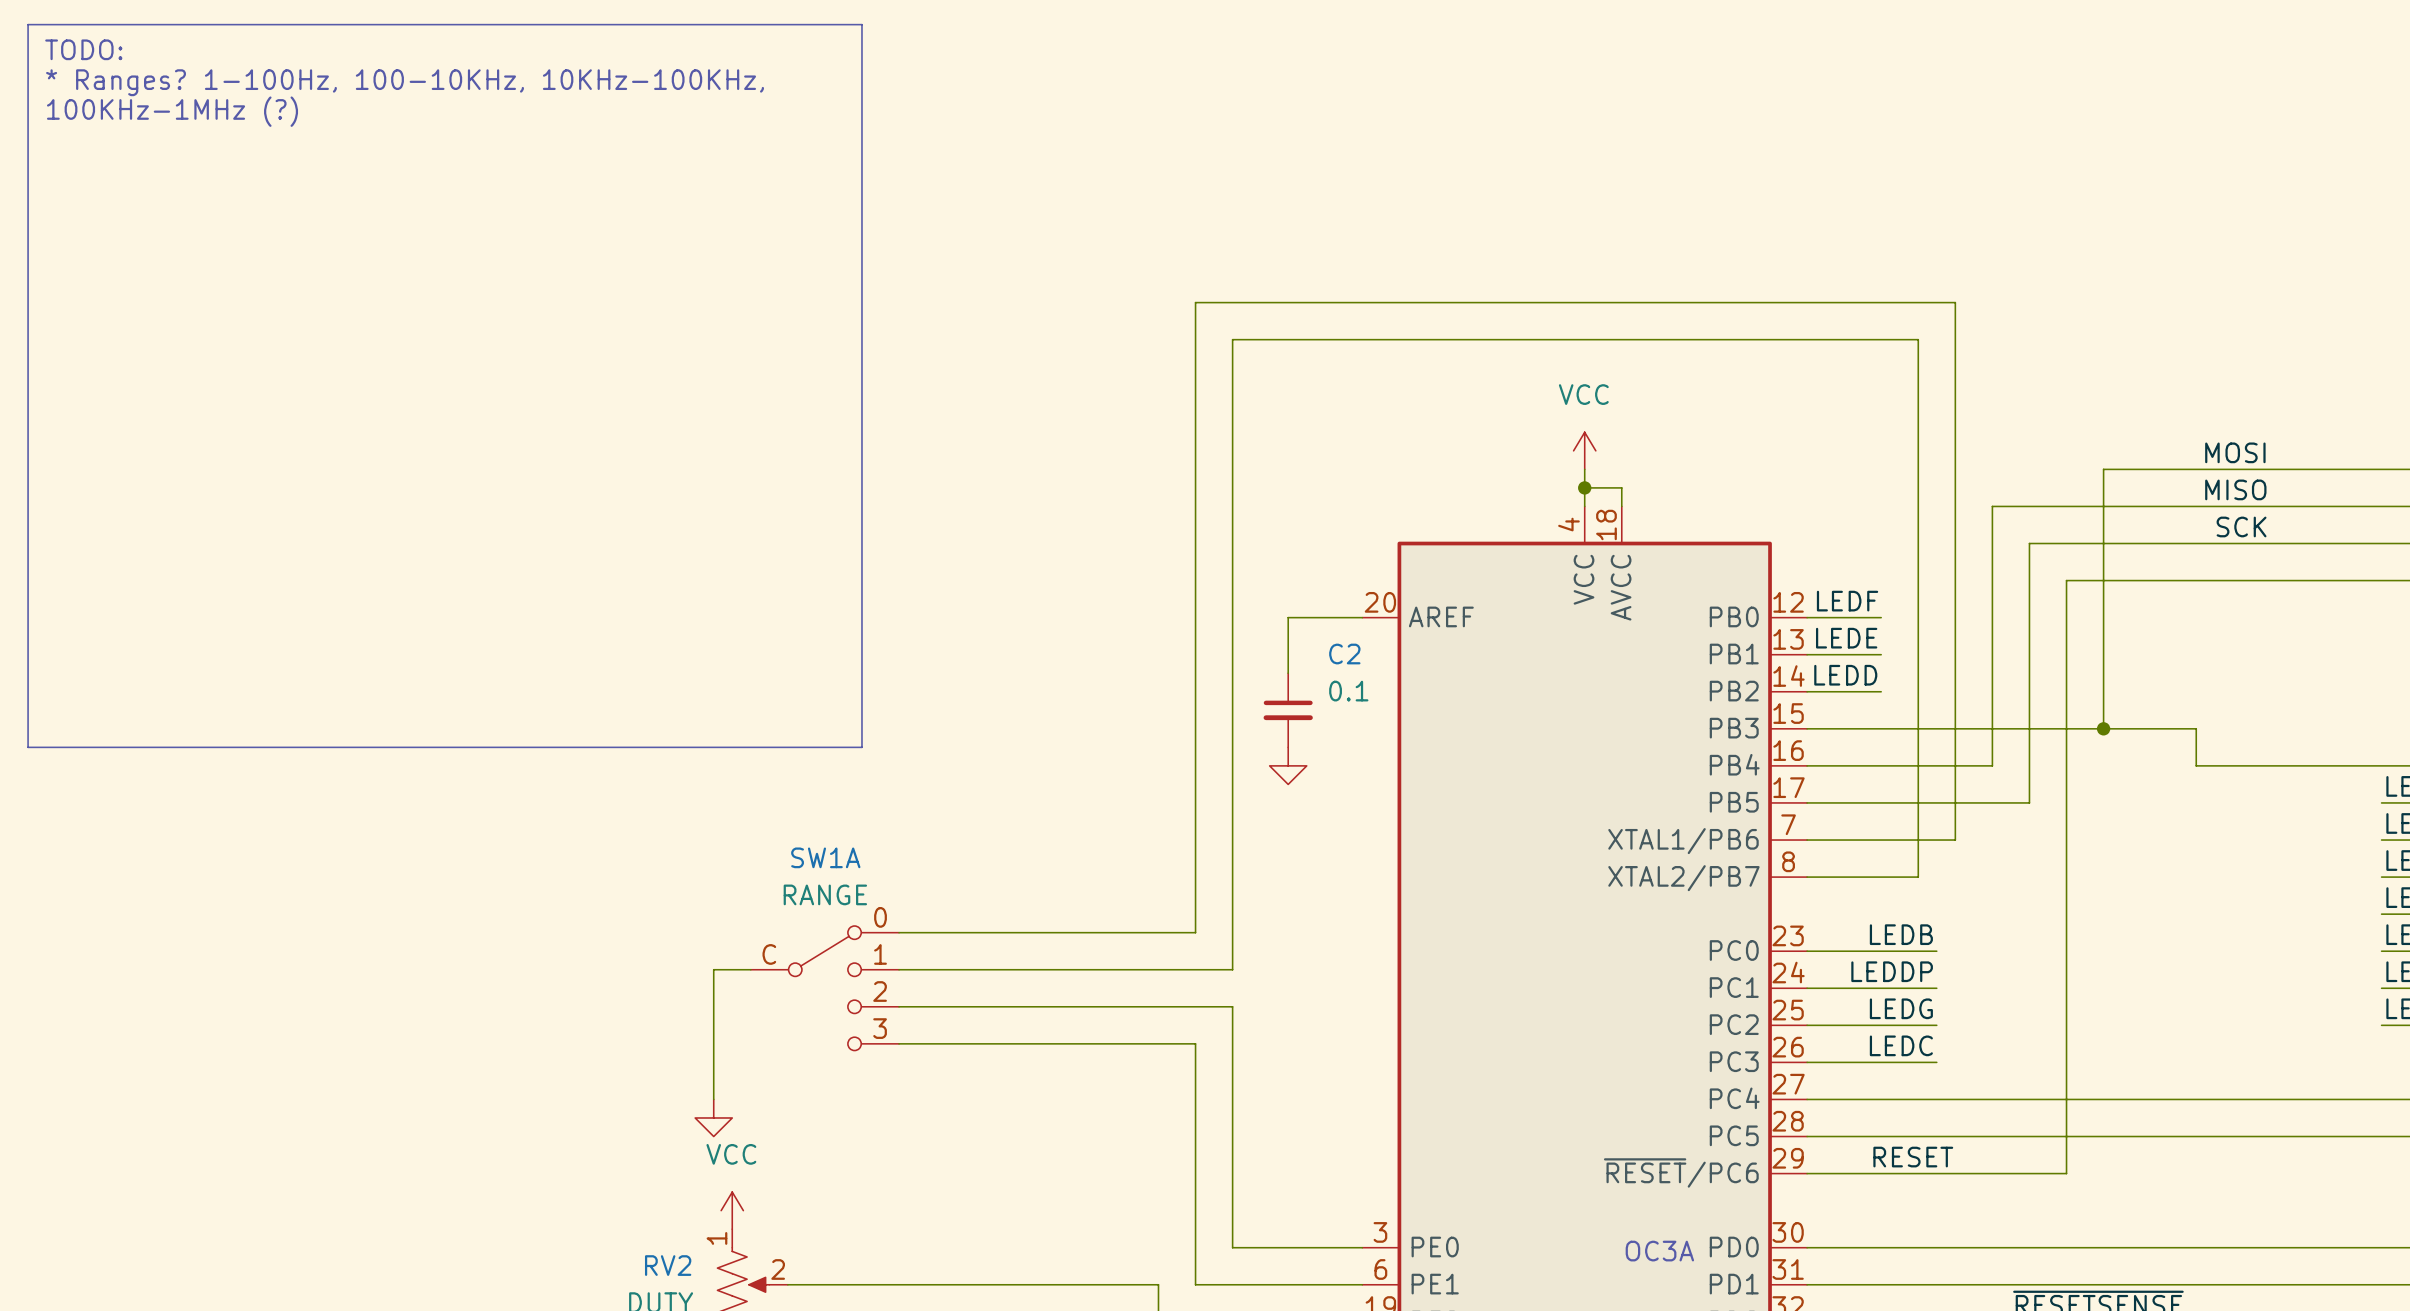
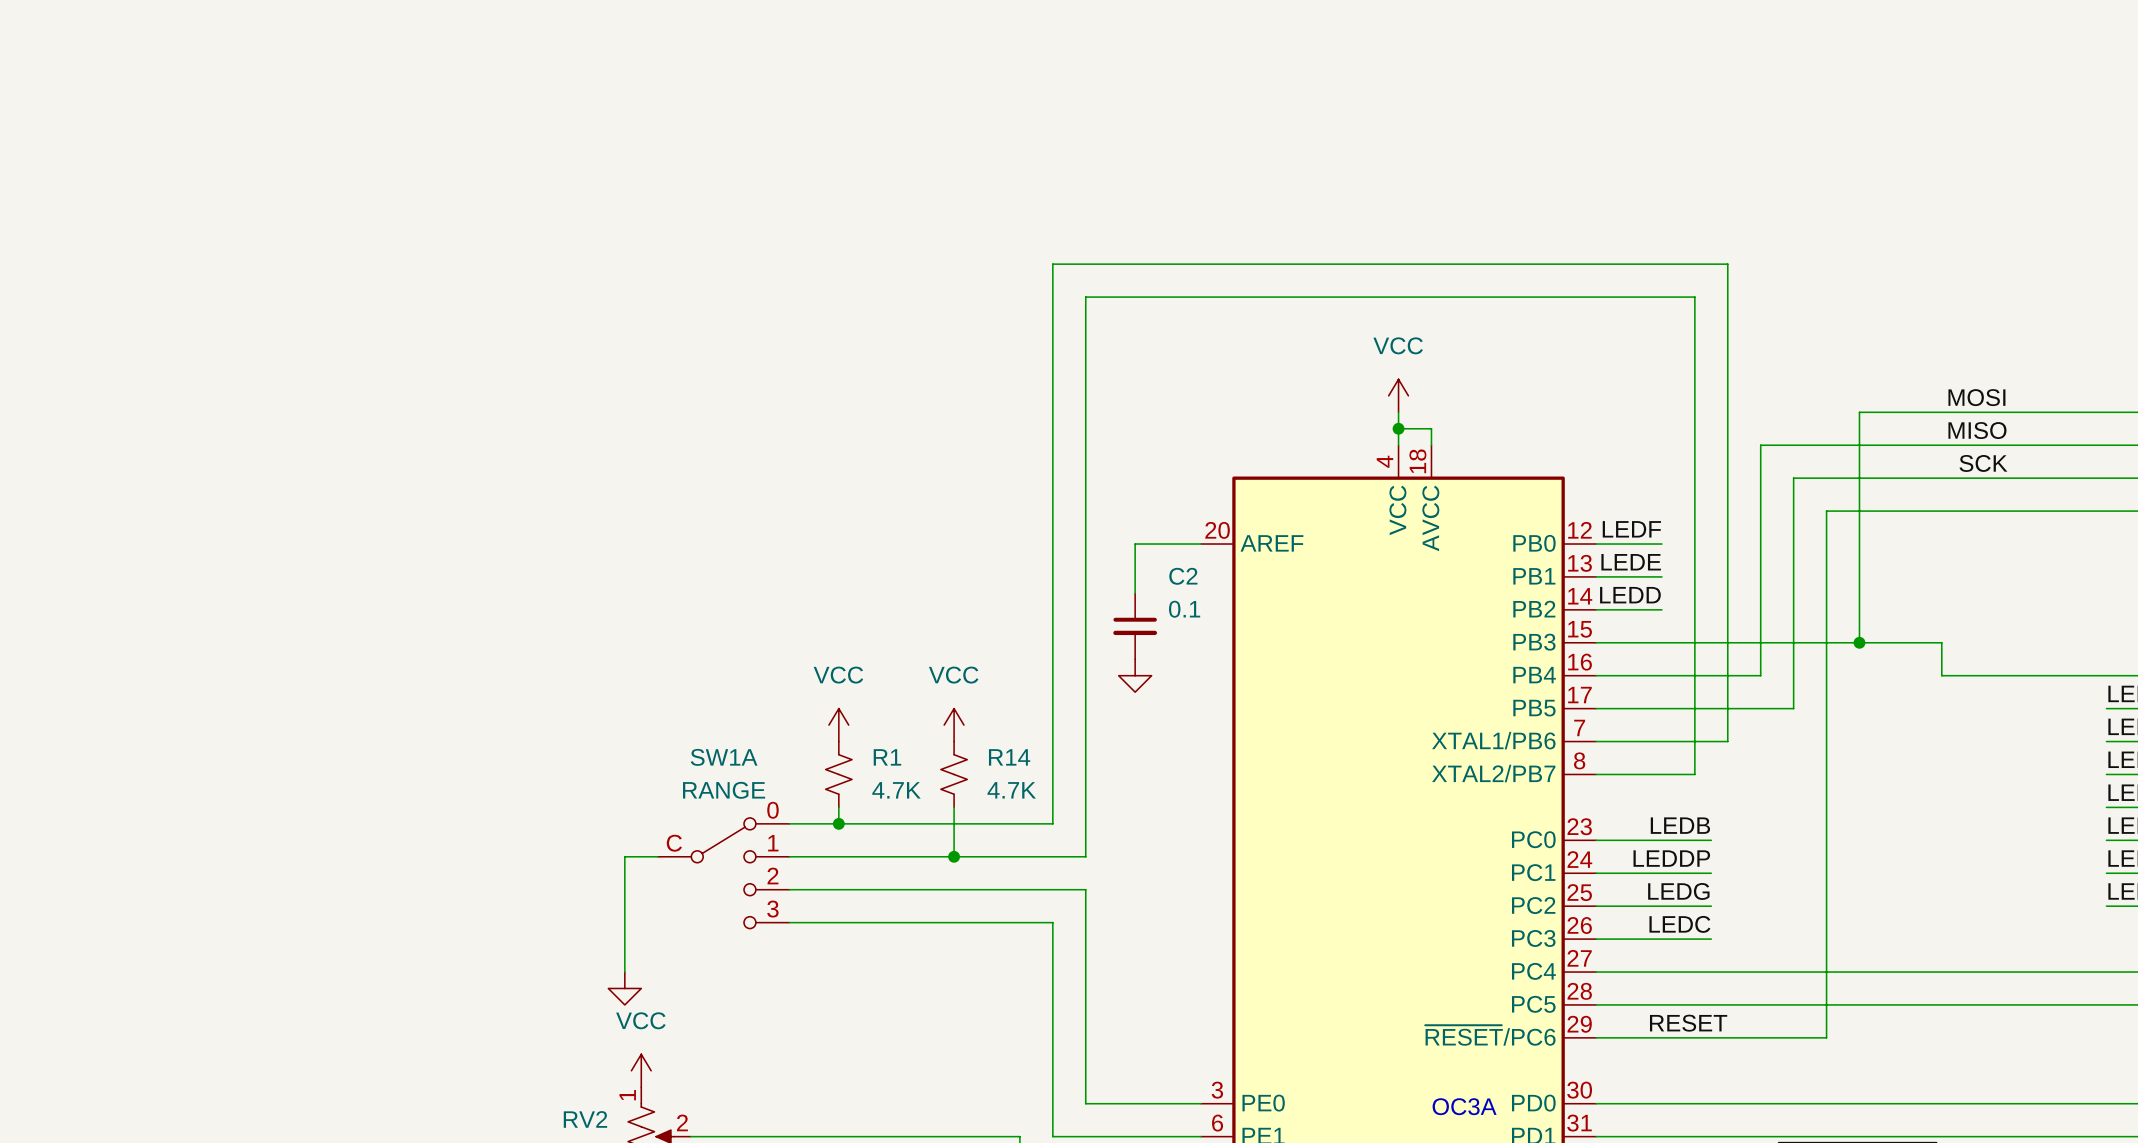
line: (28, 24) (861, 24) (861, 747) (28, 747) (28, 24) -> none
text: TODO: (83, 49) -> none
text: * Ranges? 1-100Hz, 100-10KHz, 10KHz-100KHz, (405, 82) -> none
text: 100KHz-1MHz (?) (172, 111) -> none
power symbol: none -> VCC (838, 725)
power symbol: none -> VCC (954, 725)
R1: none -> 4.7K (838, 774)
R14: none -> 4.7K (954, 774)
wire: none -> (838, 807) (838, 823)
wire: none -> (954, 807) (954, 856)
junction: none -> (838, 823)
junction: none -> (954, 856)

